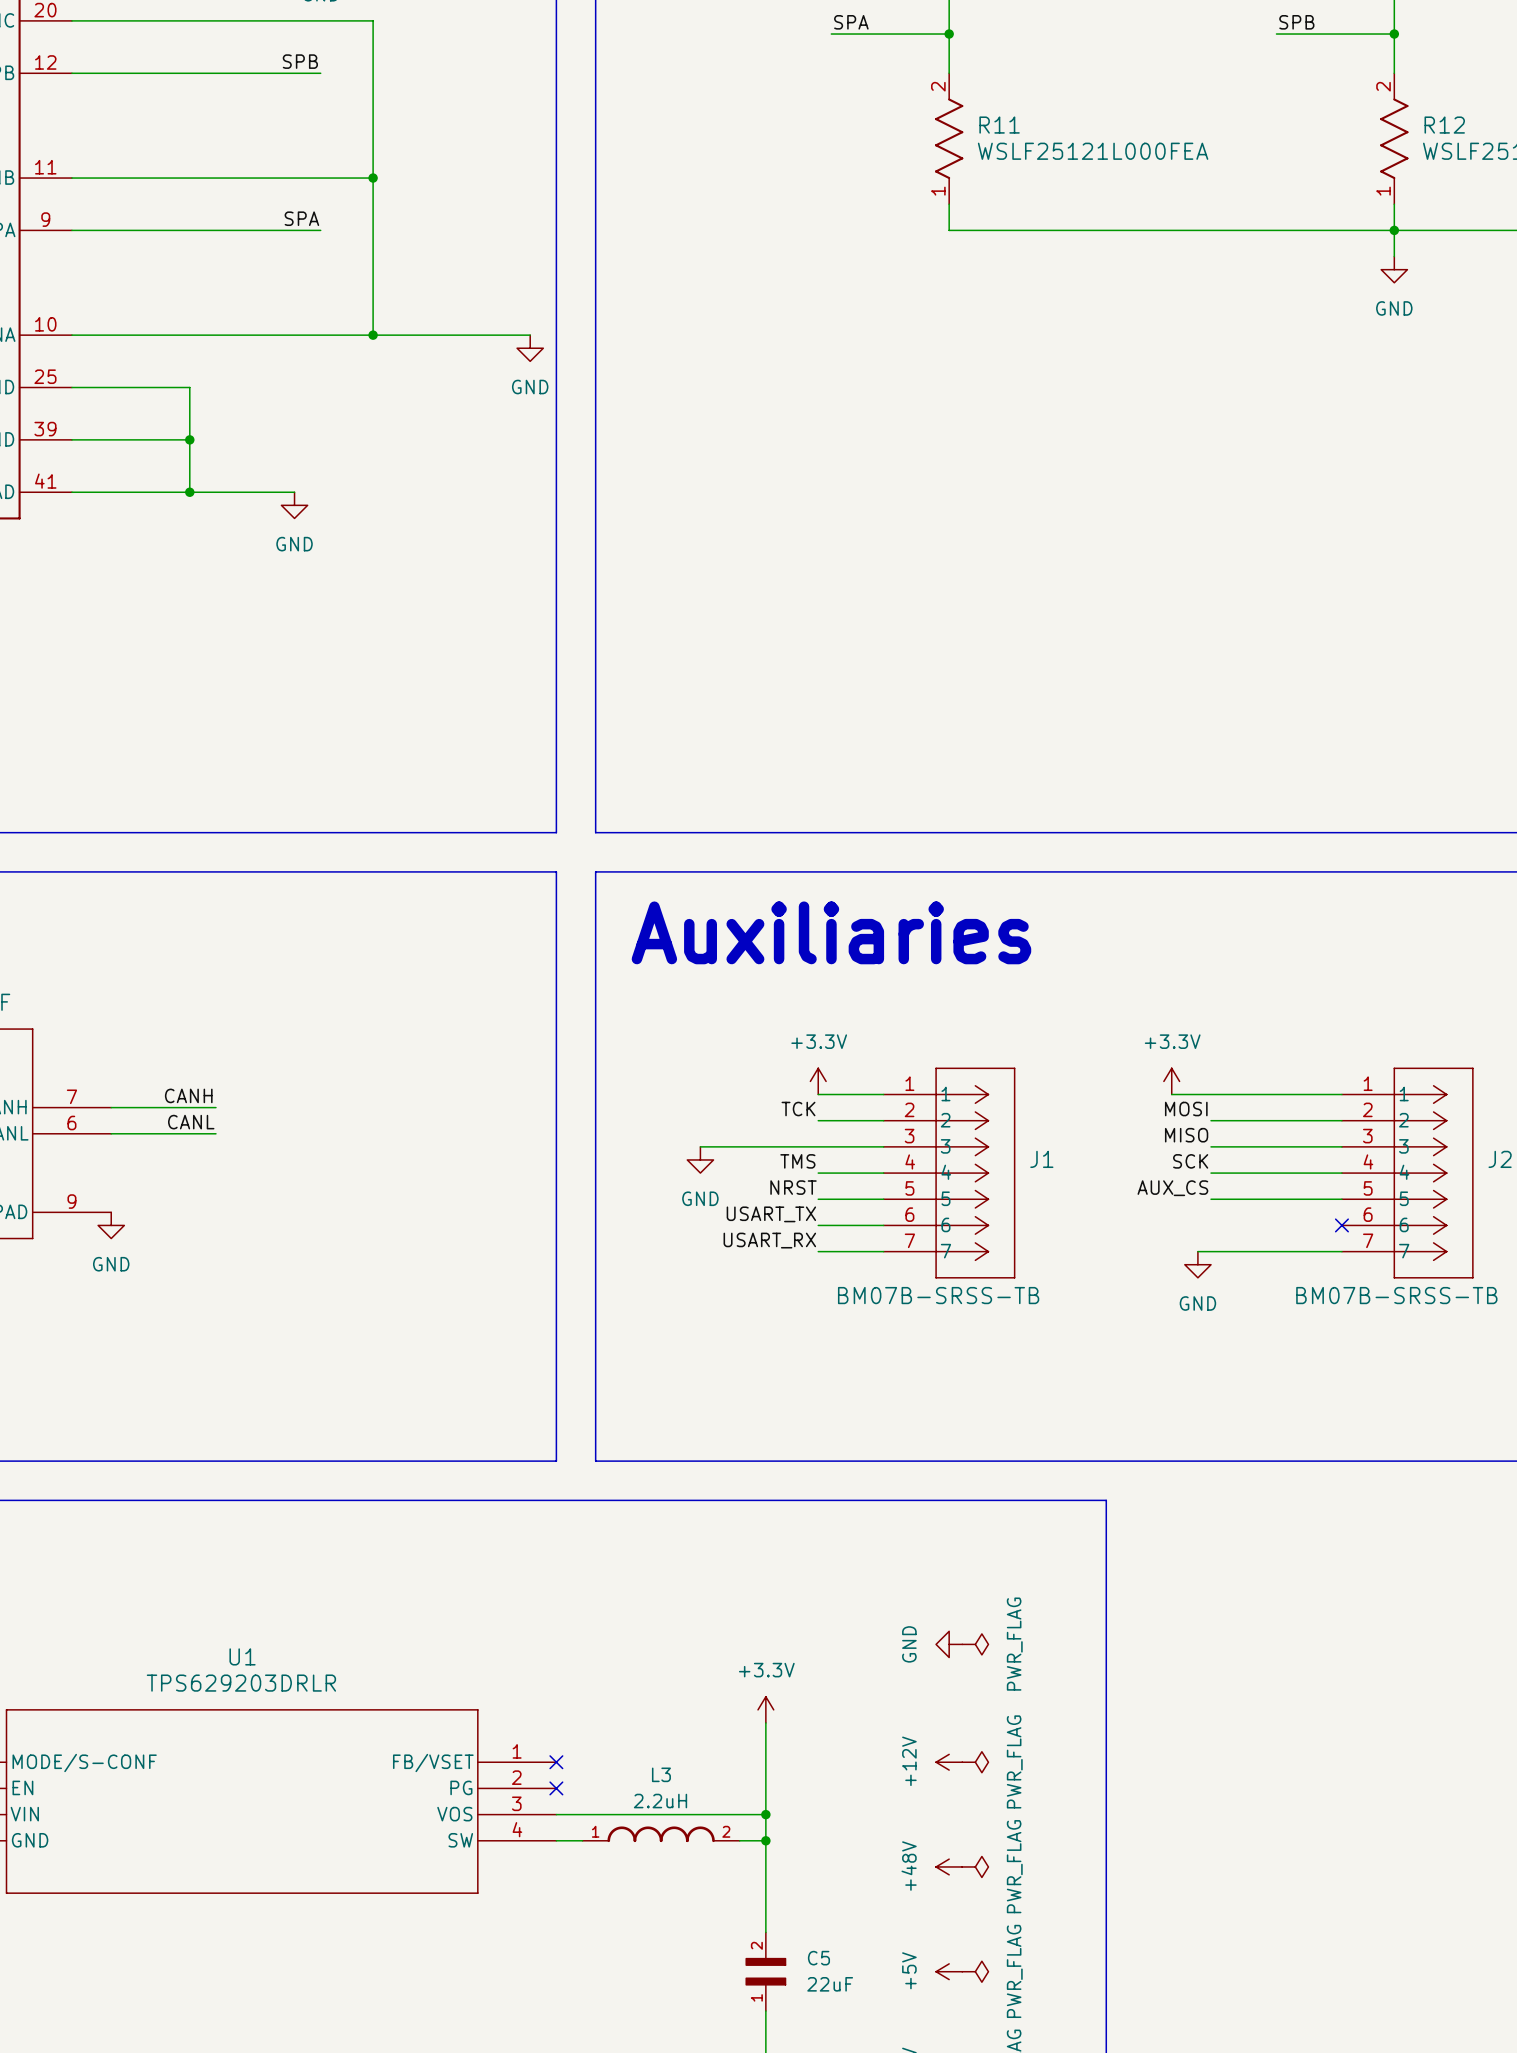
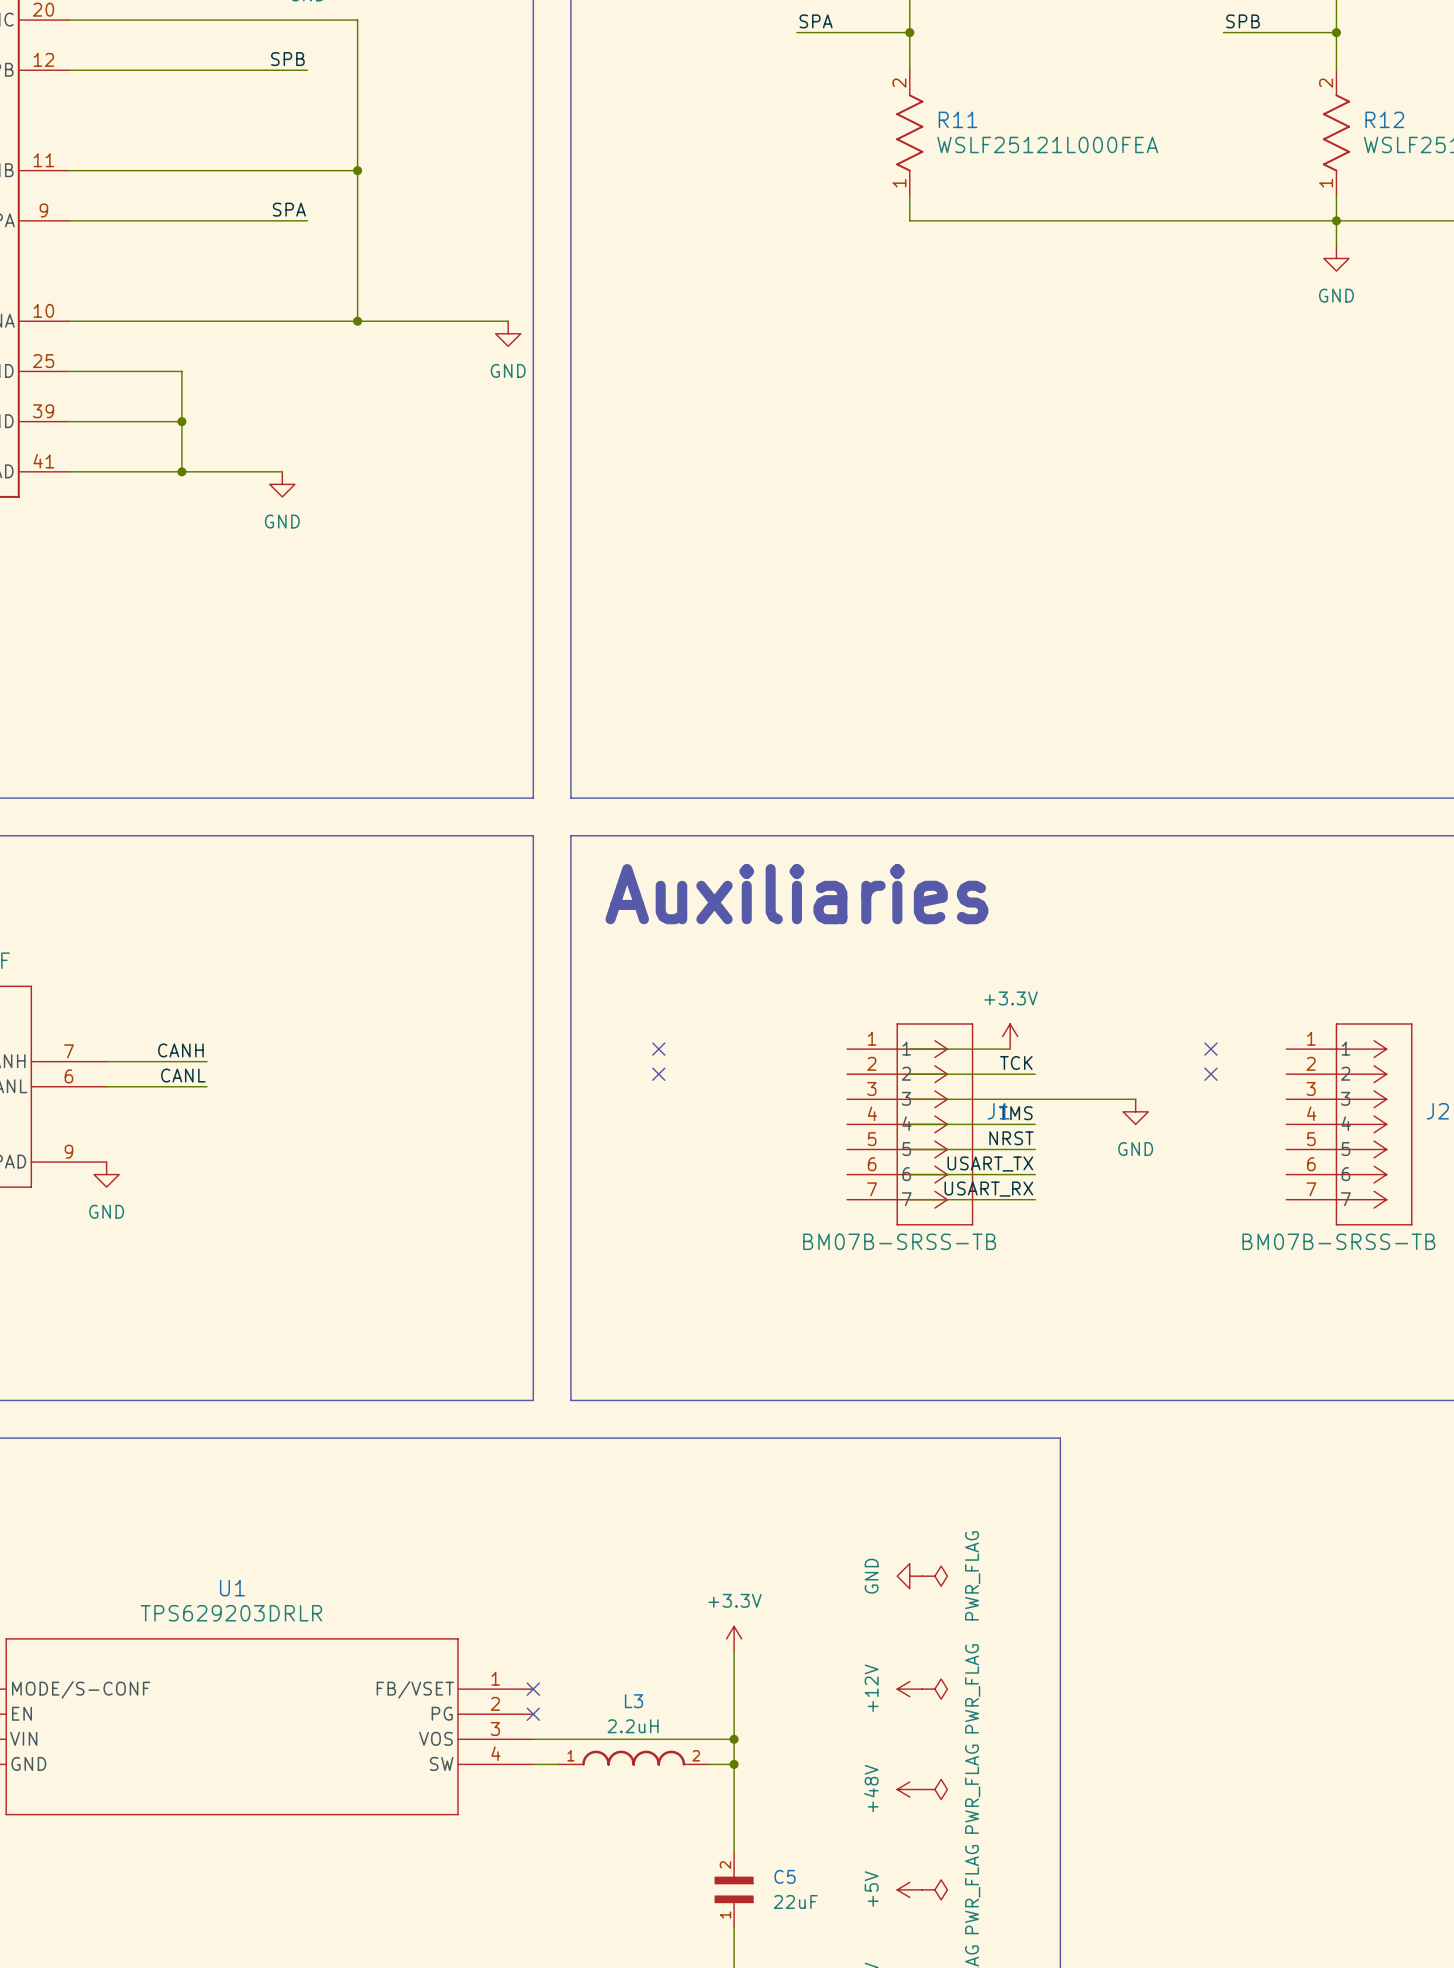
power symbol: +3.3V (818, 1081) -> none
power symbol: none -> +3.3V (1010, 1036)
power symbol: +3.3V (1171, 1081) -> none
no-connect mark: none -> (658, 1049)
wire: (818, 1094) (883, 1094) -> none
wire: none -> (909, 1049) (1010, 1049)
wire: (1171, 1094) (1341, 1094) -> none
no-connect mark: none -> (1210, 1049)
label: TCK (798, 1109) -> none
label: none -> TCK (1016, 1062)
label: MOSI (1186, 1109) -> none
no-connect mark: none -> (658, 1074)
wire: (818, 1120) (883, 1120) -> none
wire: none -> (909, 1074) (1035, 1074)
wire: (1211, 1120) (1341, 1120) -> none
no-connect mark: none -> (1210, 1074)
label: MISO (1186, 1135) -> none
wire: (700, 1146) (883, 1146) -> none
wire: none -> (909, 1099) (1135, 1099)
wire: (1211, 1146) (1341, 1146) -> none
power symbol: GND (700, 1159) -> none
label: TMS (797, 1161) -> none
label: none -> TMS (1015, 1113)
label: SCK (1190, 1161) -> none
wire: (818, 1173) (883, 1173) -> none
wire: none -> (909, 1124) (1035, 1124)
wire: (1211, 1173) (1341, 1173) -> none
label: NRST (793, 1187) -> none
label: none -> NRST (1011, 1138)
label: AUX_CS (1172, 1188) -> none
wire: (818, 1199) (883, 1199) -> none
wire: none -> (909, 1149) (1035, 1149)
wire: (1211, 1199) (1341, 1199) -> none
label: USART_TX (771, 1214) -> none
label: none -> USART_TX (990, 1163)
wire: (818, 1225) (883, 1225) -> none
wire: none -> (909, 1174) (1035, 1174)
no-connect mark: (1341, 1225) -> none
label: USART_RX (769, 1240) -> none
label: none -> USART_RX (988, 1189)
wire: (818, 1251) (883, 1251) -> none
wire: none -> (909, 1199) (1035, 1199)
wire: (1197, 1251) (1341, 1251) -> none
power symbol position: GND (1197, 1264) -> GND (1135, 1111)

